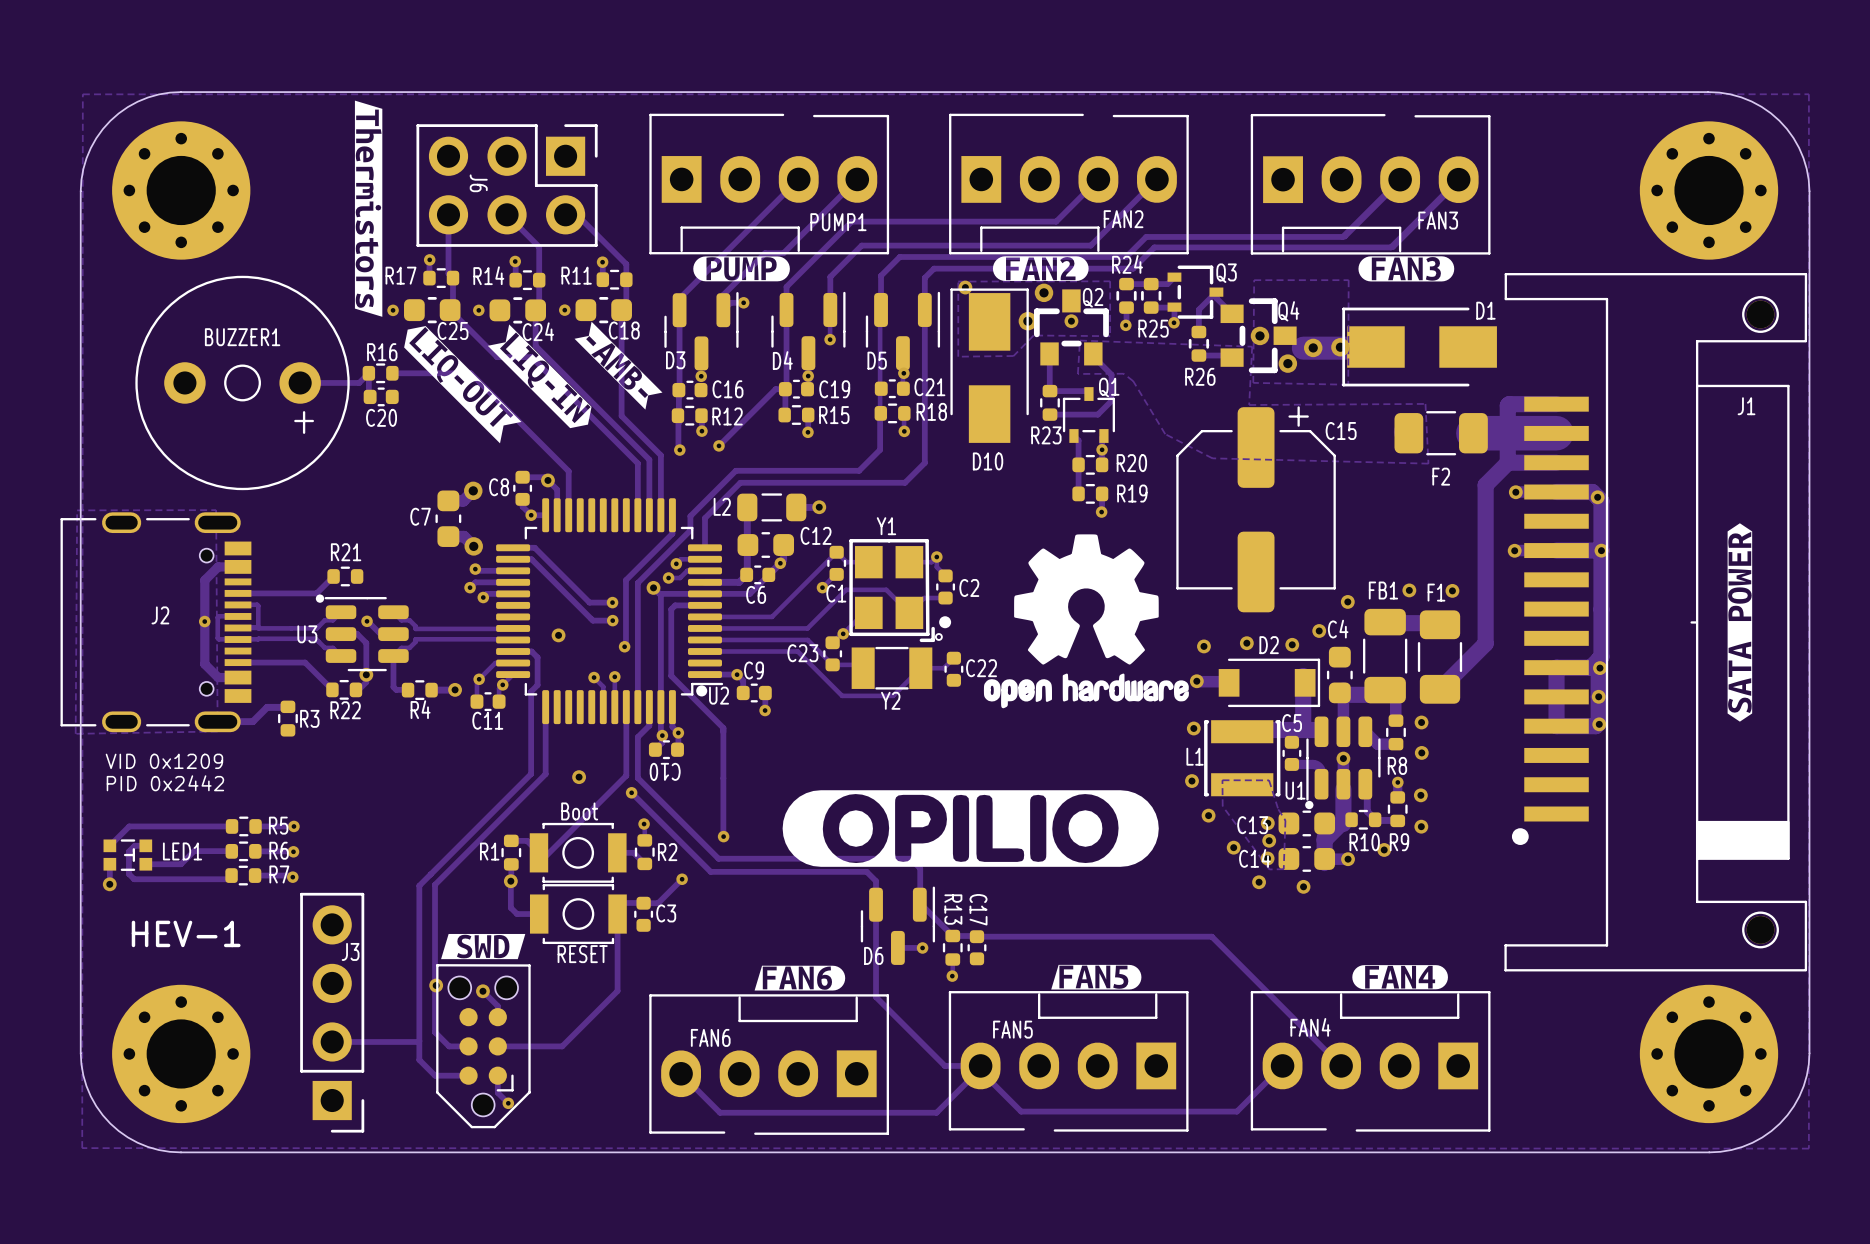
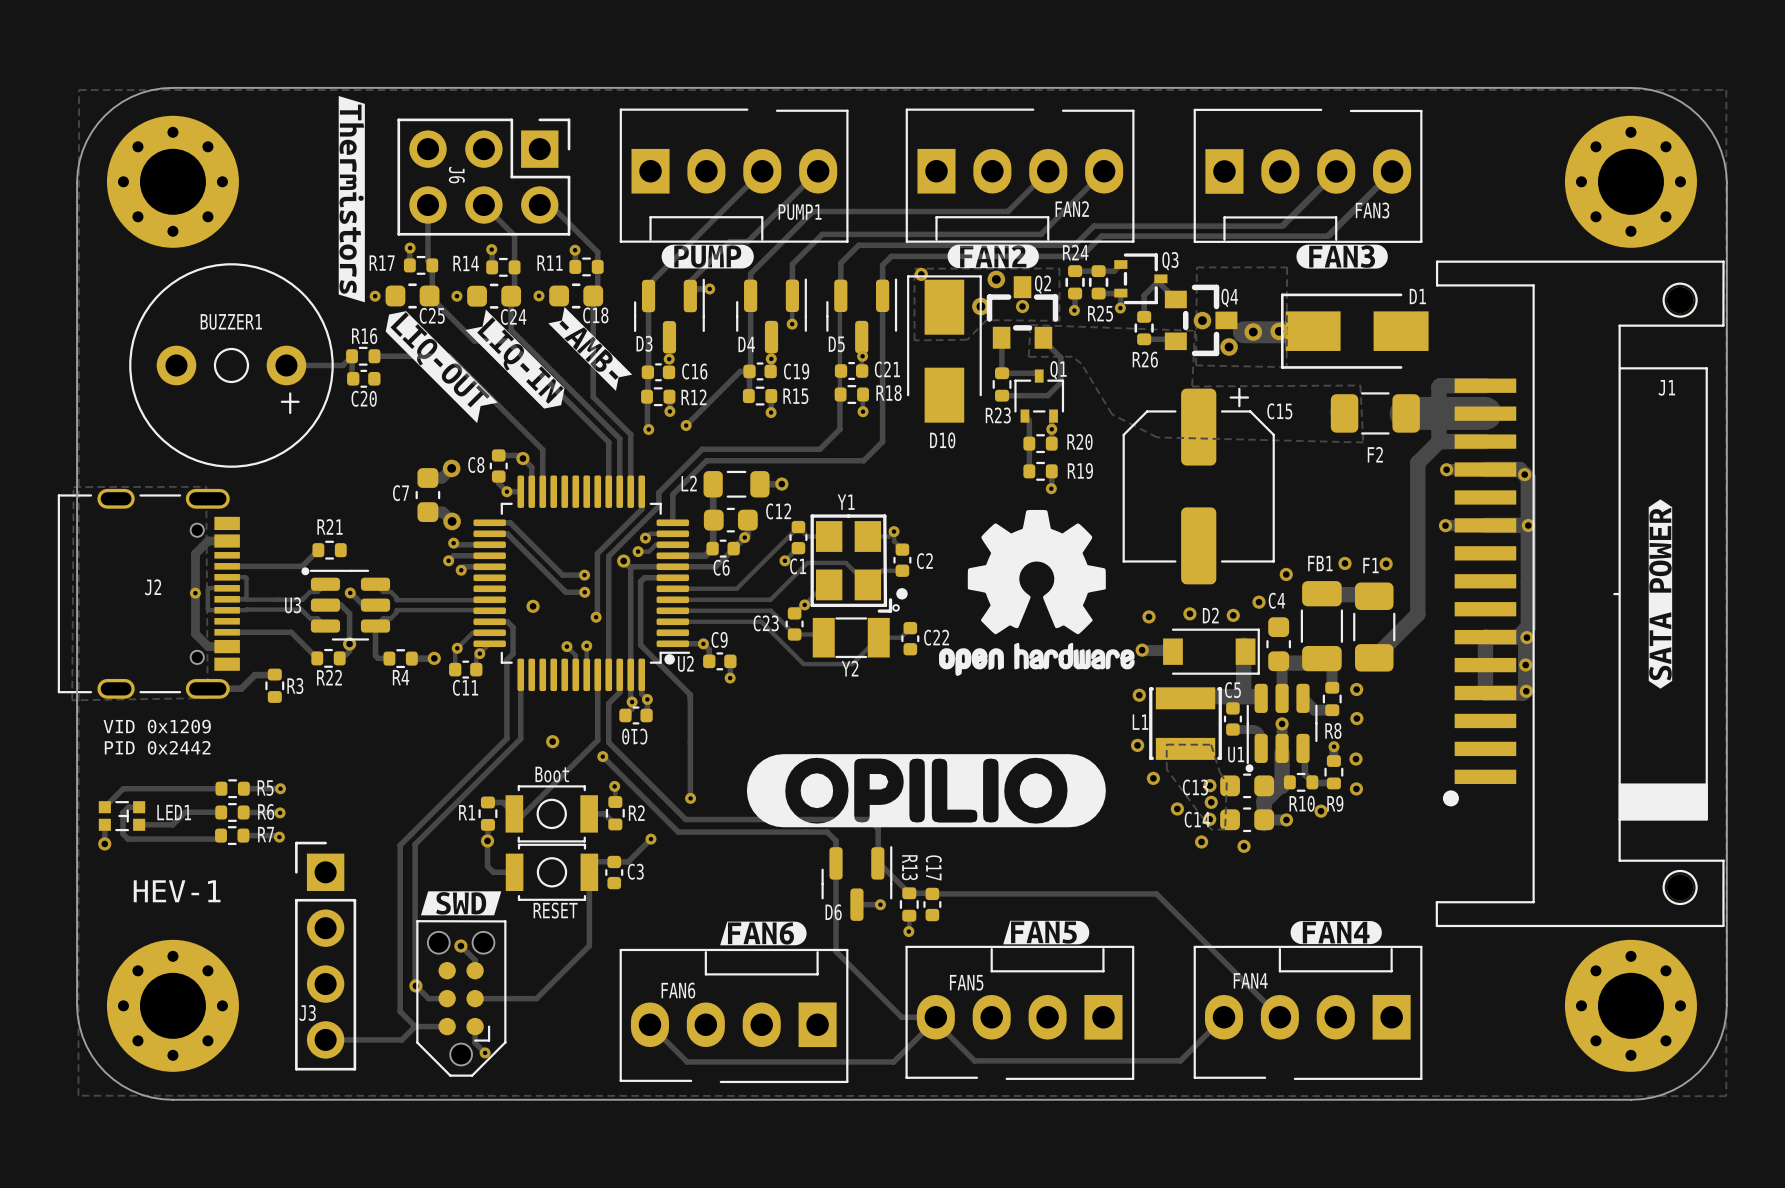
via position: (436, 985) -> (415, 985)
J3 rotation: 0° (332, 1012) -> 180° (325, 956)
track: (419, 1041) (332, 1041) -> none
track: none -> (415, 1026) (401, 1039) (325, 1039)

